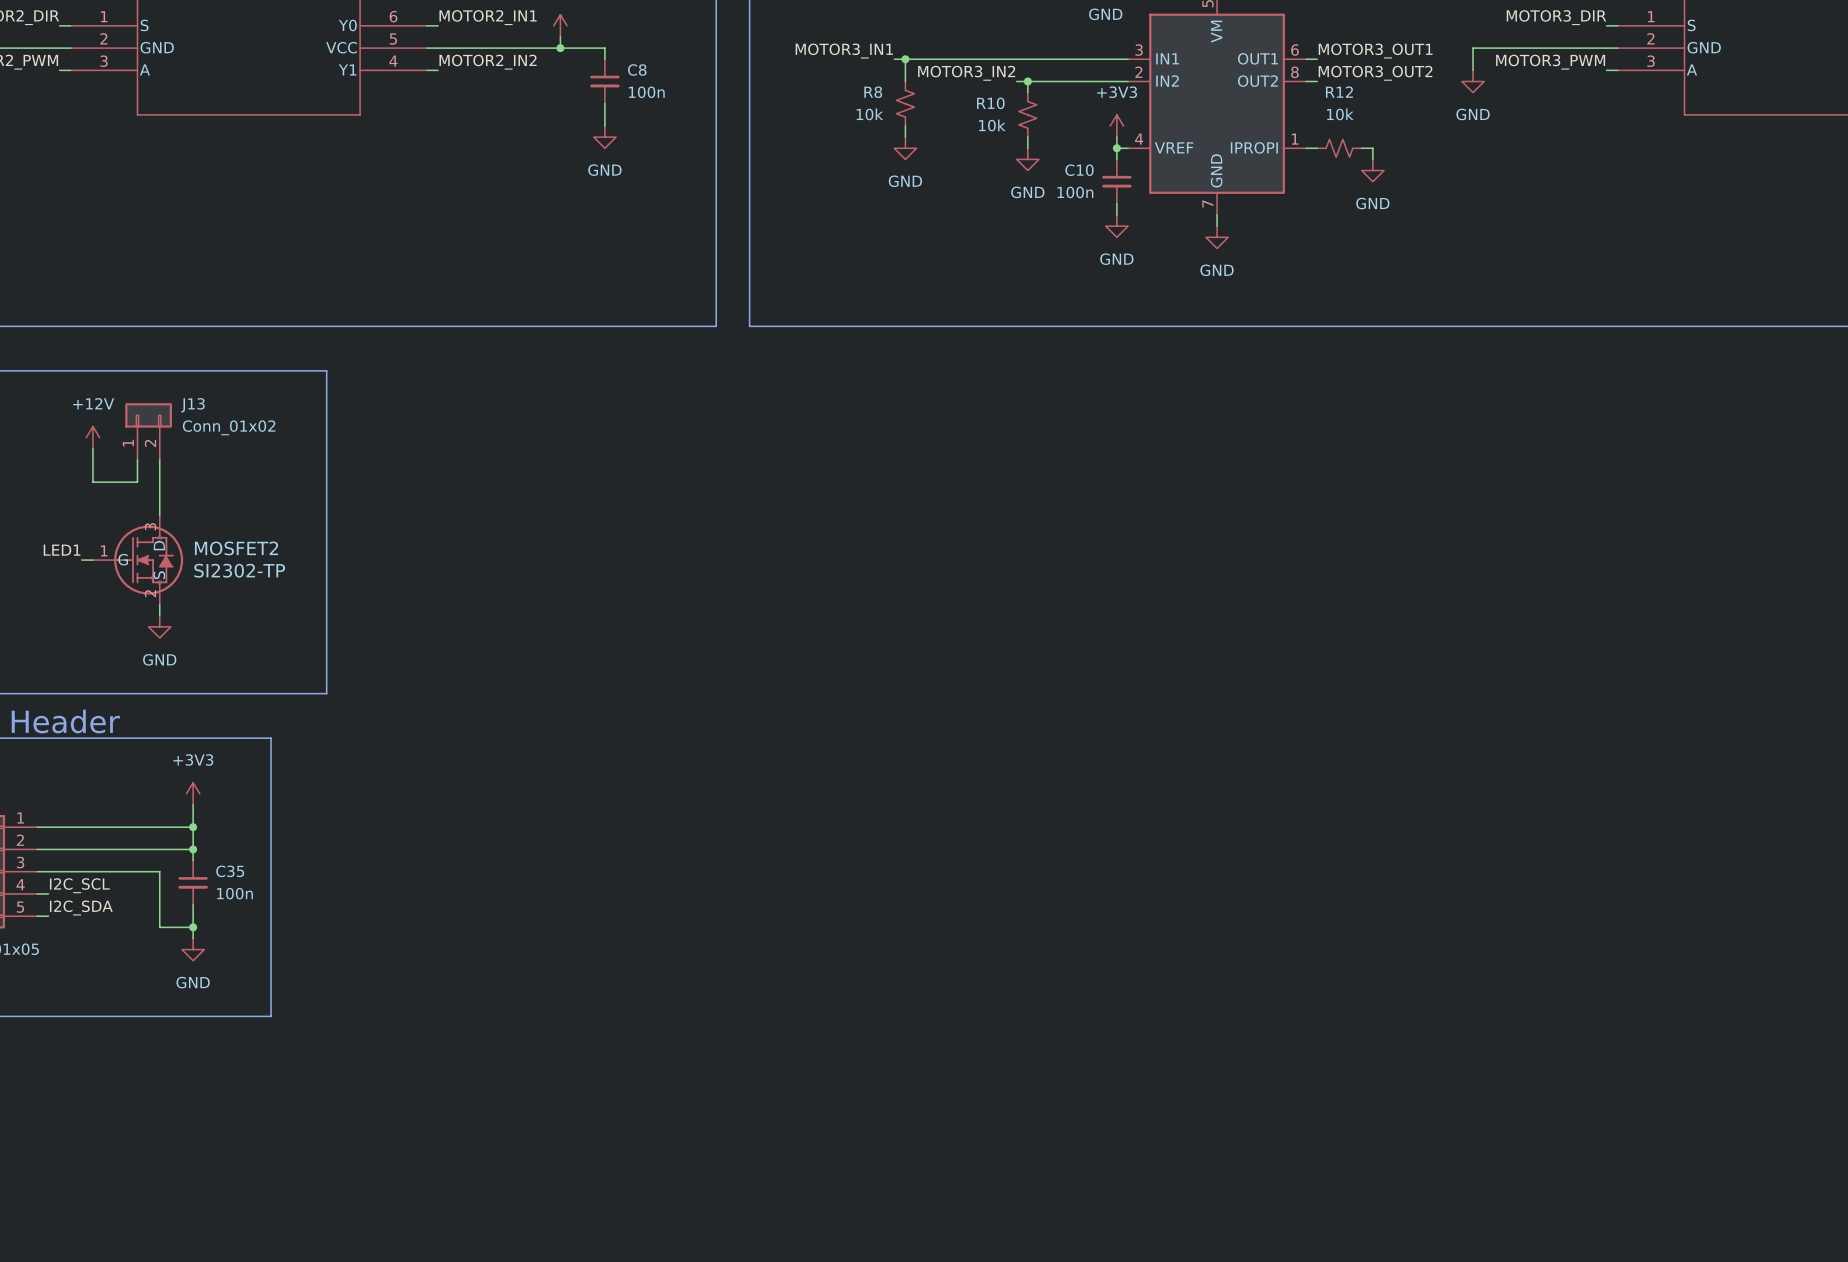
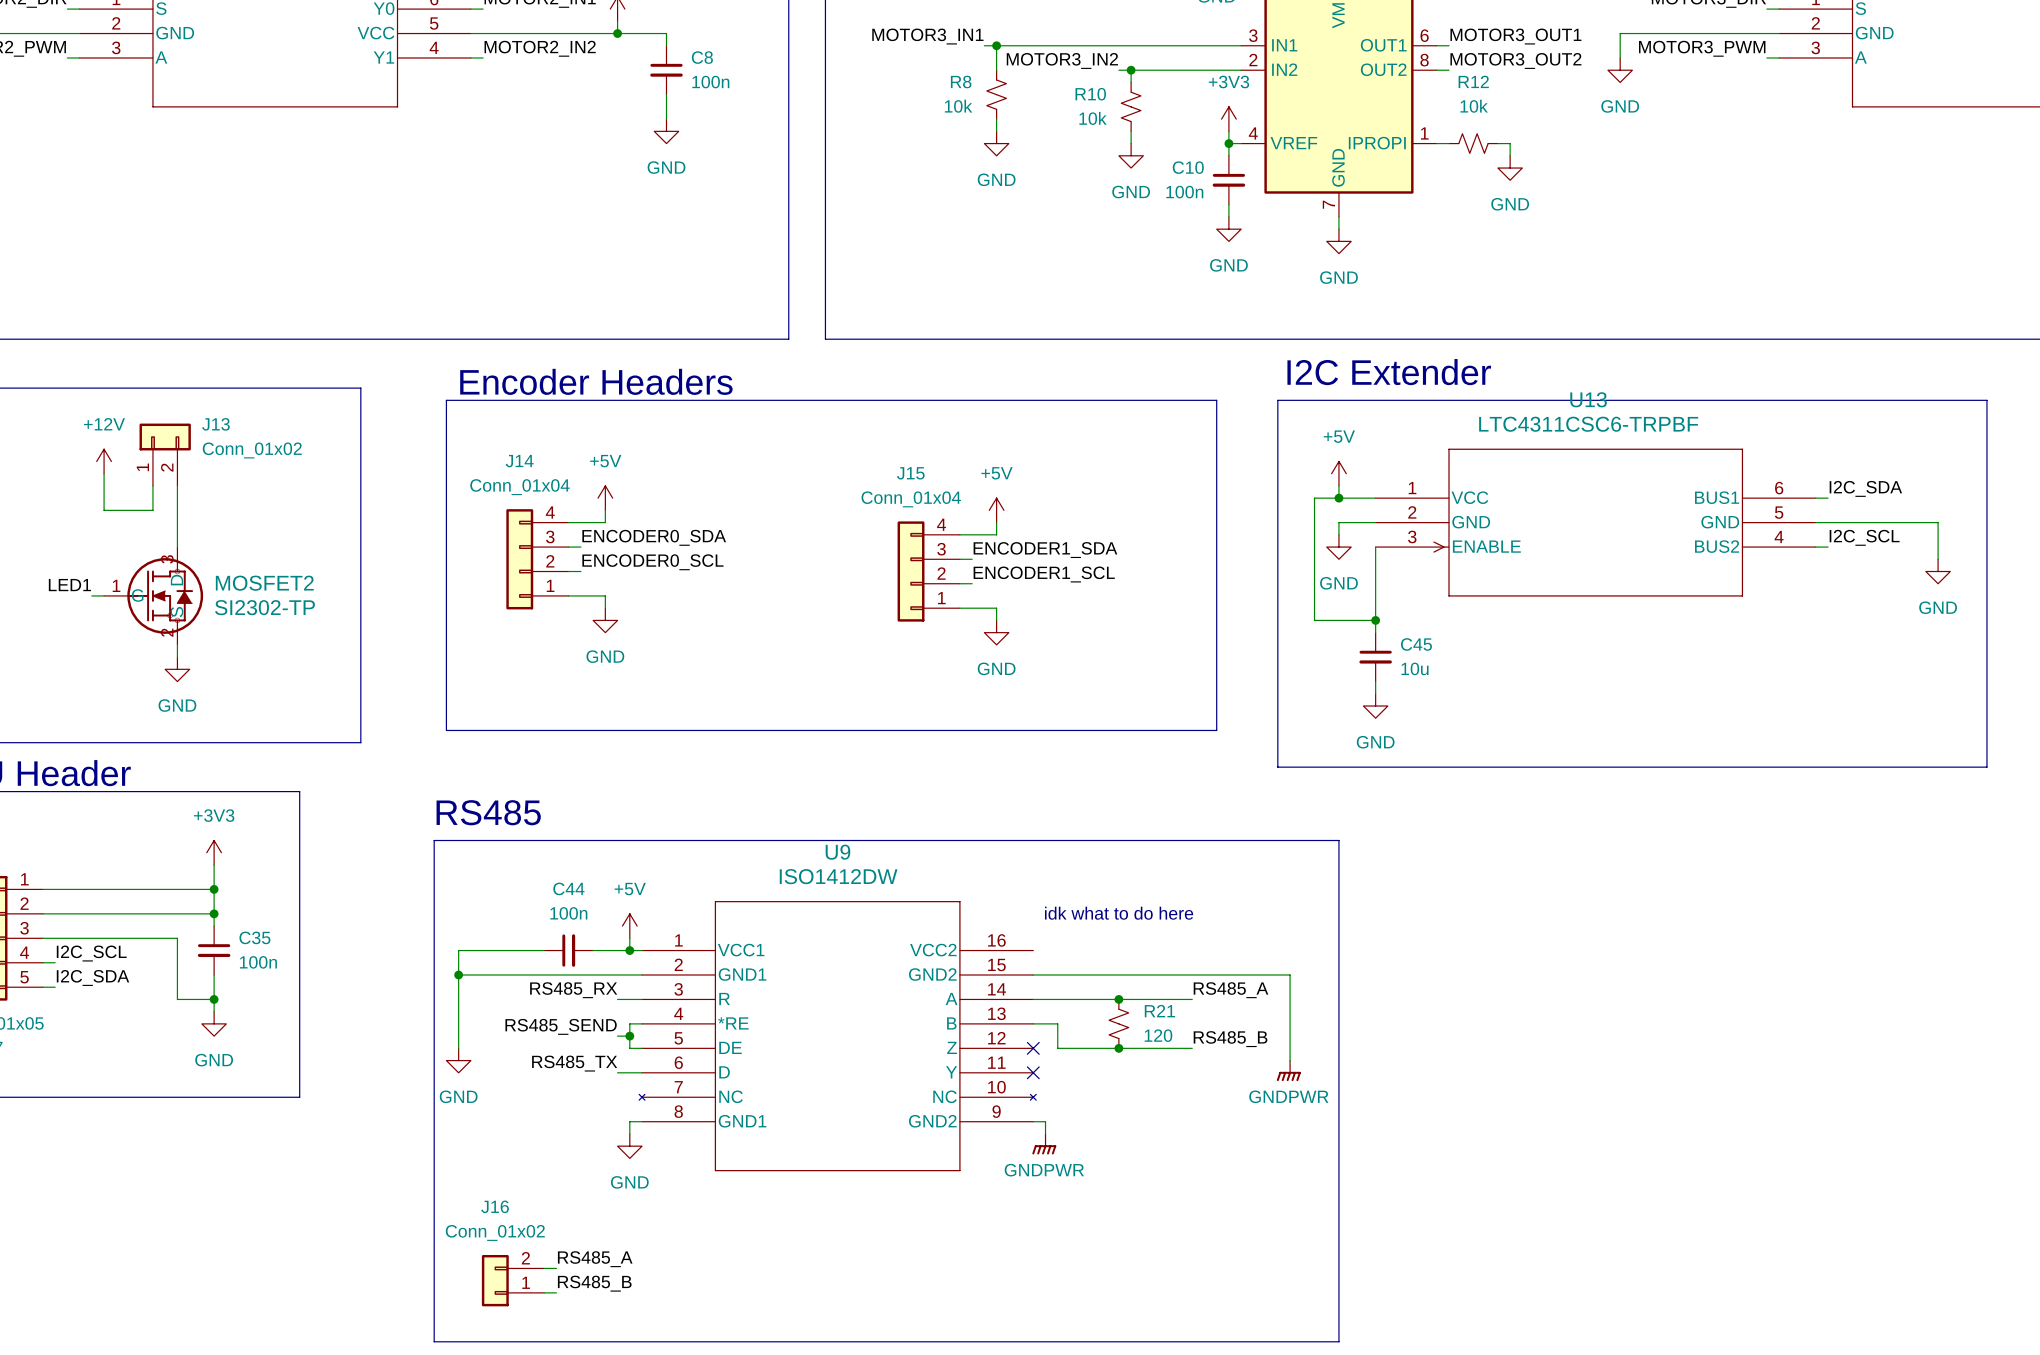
text: none -> I2C Extender (1389, 372)
text: none -> Encoder Headers (596, 381)
line: none -> (446, 400) (1216, 400) (1216, 730) (446, 730) (446, 400)
line: none -> (1277, 400) (1986, 400) (1986, 767) (1277, 767) (1277, 400)
power symbol: none -> +5V (1338, 473)
wire: none -> (1338, 485) (1338, 498)
label: none -> I2C_SDA (1865, 488)
power symbol: none -> +5V (605, 498)
junction: none -> (1338, 498)
wire: none -> (1375, 498) (1314, 498) (1314, 620) (1375, 620)
wire: none -> (1815, 498) (1828, 498)
wire: none -> (605, 510) (605, 522) (568, 522)
power symbol: none -> +5V (996, 510)
wire: none -> (996, 522) (996, 534) (959, 534)
wire: none -> (1375, 522) (1338, 522) (1338, 534)
U13: none -> LTC4311CSC6-TRPBF (1595, 522)
wire: none -> (1815, 522) (1938, 522) (1938, 559)
label: none -> ENCODER0_SDA (654, 537)
label: none -> I2C_SCL (1864, 537)
wire: none -> (568, 547) (580, 547)
power symbol: none -> GND (1338, 547)
wire: none -> (1375, 547) (1375, 632)
wire: none -> (1815, 547) (1828, 547)
label: none -> ENCODER1_SDA (1045, 550)
J14: none -> Conn_01x04 (537, 559)
wire: none -> (959, 559) (972, 559)
label: none -> ENCODER0_SCL (652, 562)
wire: none -> (568, 571) (580, 571)
J15: none -> Conn_01x04 (928, 571)
power symbol: none -> GND (1938, 571)
label: none -> ENCODER1_SCL (1044, 574)
wire: none -> (959, 583) (972, 583)
wire: none -> (568, 595) (605, 595) (605, 608)
wire: none -> (959, 608) (996, 608) (996, 620)
power symbol: none -> GND (605, 620)
junction: none -> (1375, 620)
power symbol: none -> GND (996, 632)
C45: none -> 10u (1375, 657)
wire: none -> (1375, 681) (1375, 693)
power symbol: none -> GND (1375, 706)
text: none -> RS485 (488, 812)
line: none -> (434, 840) (1338, 840) (1338, 1341) (434, 1341) (434, 840)
text: none -> idk what to do here (1119, 913)
power symbol: none -> +5V (629, 926)
wire: none -> (629, 938) (629, 950)
wire: none -> (544, 950) (458, 950) (458, 1048)
C44: none -> 100n (568, 950)
wire: none -> (593, 950) (642, 950)
junction: none -> (629, 950)
wire: none -> (458, 974) (642, 974)
junction: none -> (458, 974)
wire: none -> (1033, 974) (1290, 974) (1290, 1060)
label: none -> RS485_RX (573, 990)
label: none -> RS485_A (1230, 990)
wire: none -> (617, 999) (642, 999)
wire: none -> (1033, 999) (1192, 999)
junction: none -> (1118, 999)
wire: none -> (642, 1023) (629, 1023) (629, 1048) (642, 1048)
wire: none -> (1033, 1023) (1057, 1023) (1057, 1048) (1192, 1048)
R21: none -> 120 (1118, 1023)
label: none -> RS485_SEND (561, 1026)
wire: none -> (617, 1036) (629, 1036)
junction: none -> (629, 1036)
U9: none -> ISO1412DW (837, 1036)
label: none -> RS485_B (1230, 1039)
no-connect mark: none -> (1033, 1048)
junction: none -> (1118, 1048)
power symbol: none -> GND (458, 1060)
label: none -> RS485_TX (574, 1063)
power symbol: none -> GNDPWR (1288, 1070)
wire: none -> (617, 1072) (642, 1072)
no-connect mark: none -> (1033, 1072)
wire: none -> (642, 1121) (629, 1121) (629, 1133)
wire: none -> (1033, 1121) (1045, 1121) (1045, 1133)
power symbol: none -> GNDPWR (1044, 1144)
power symbol: none -> GND (629, 1146)
label: none -> RS485_A (595, 1259)
wire: none -> (544, 1268) (556, 1268)
J16: none -> Conn_01x02 (513, 1280)
label: none -> RS485_B (594, 1283)
wire: none -> (544, 1292) (556, 1292)

